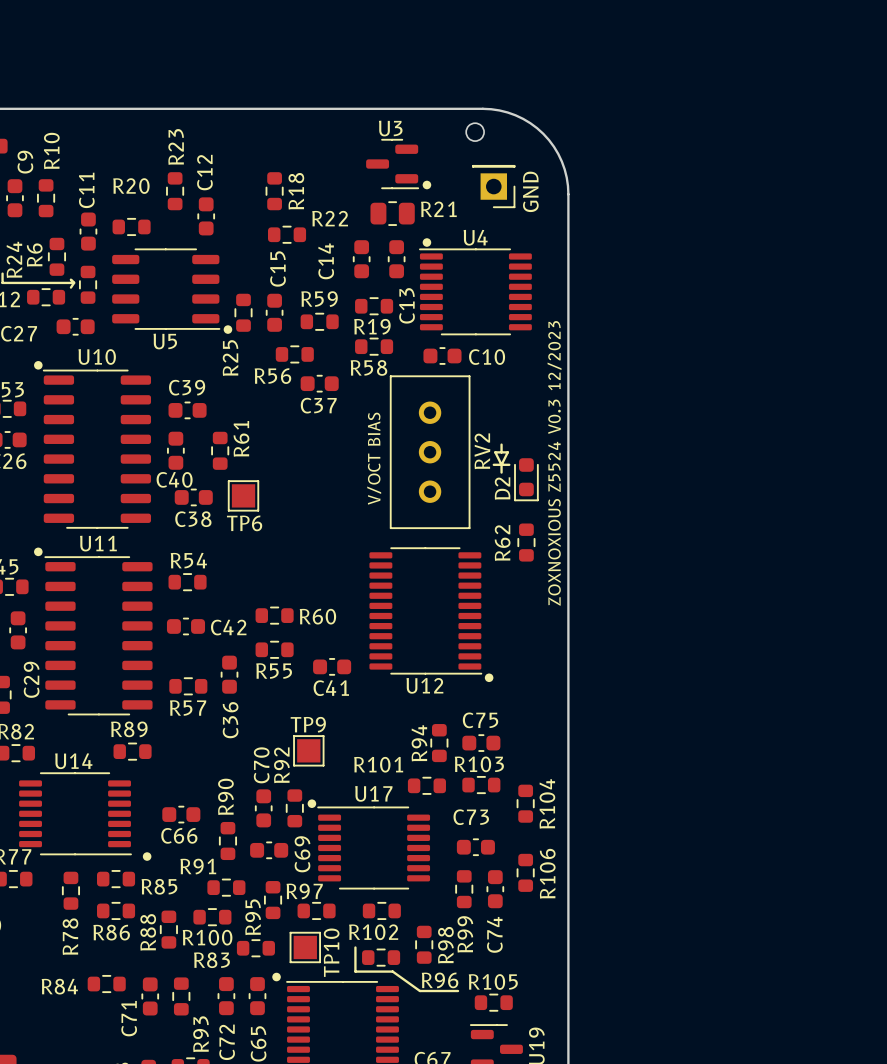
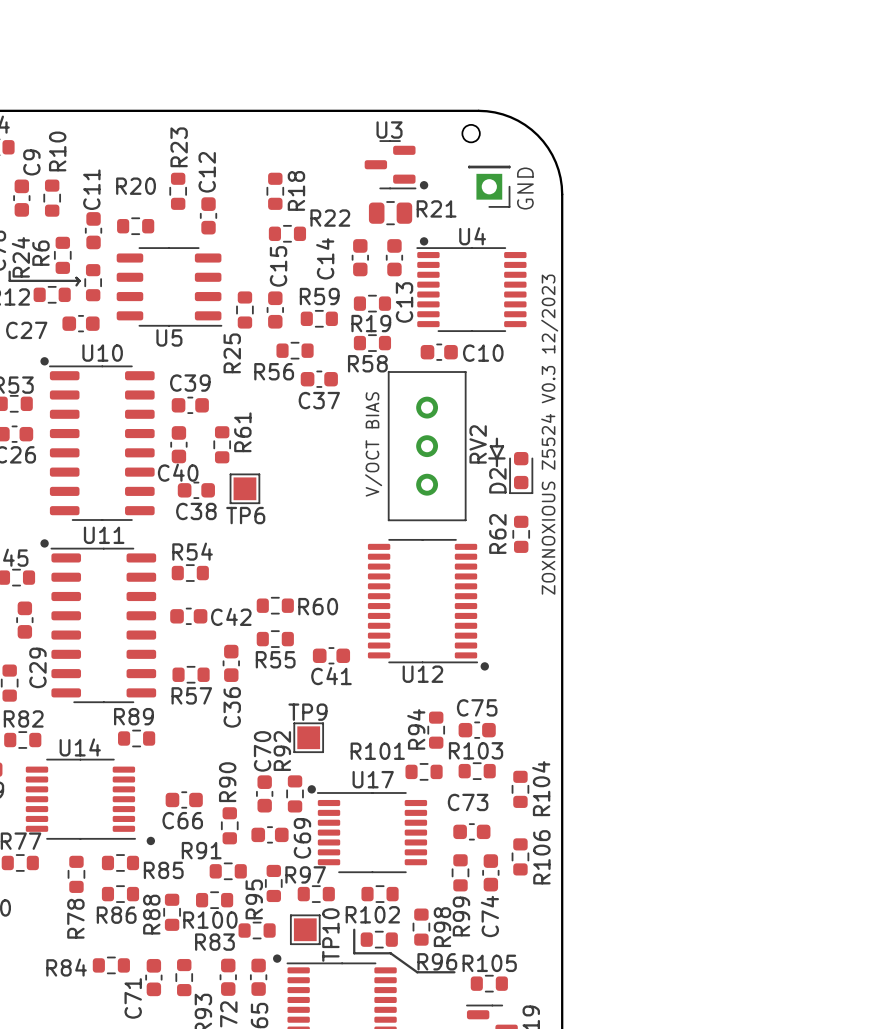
drawing: [223, 325, 233, 334] -> none

